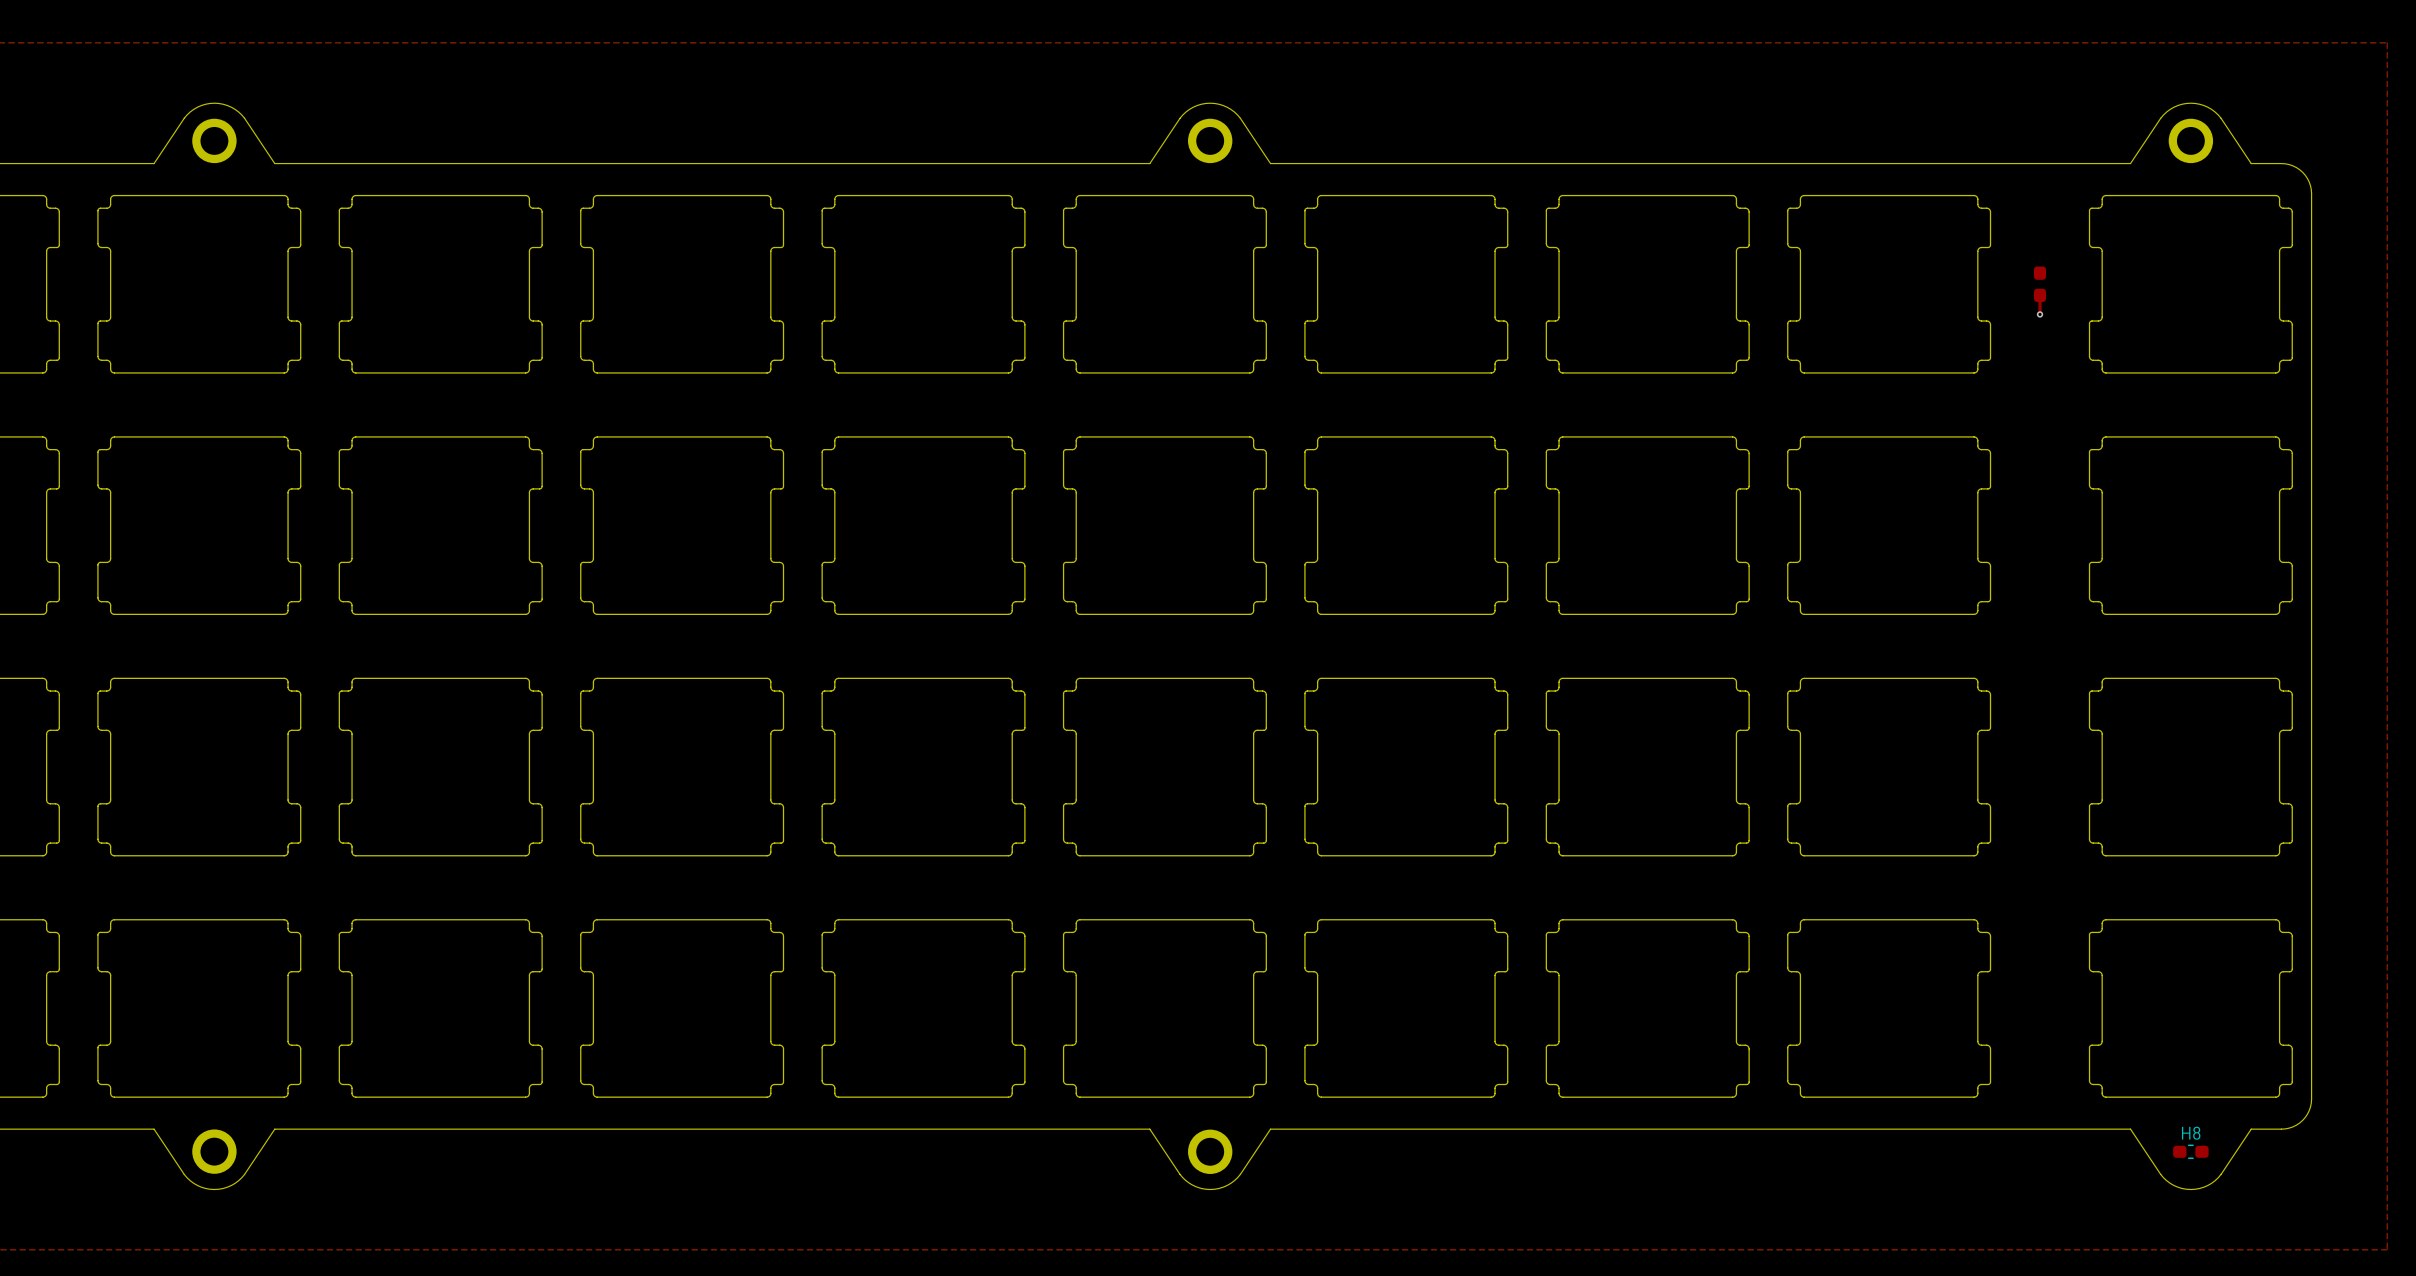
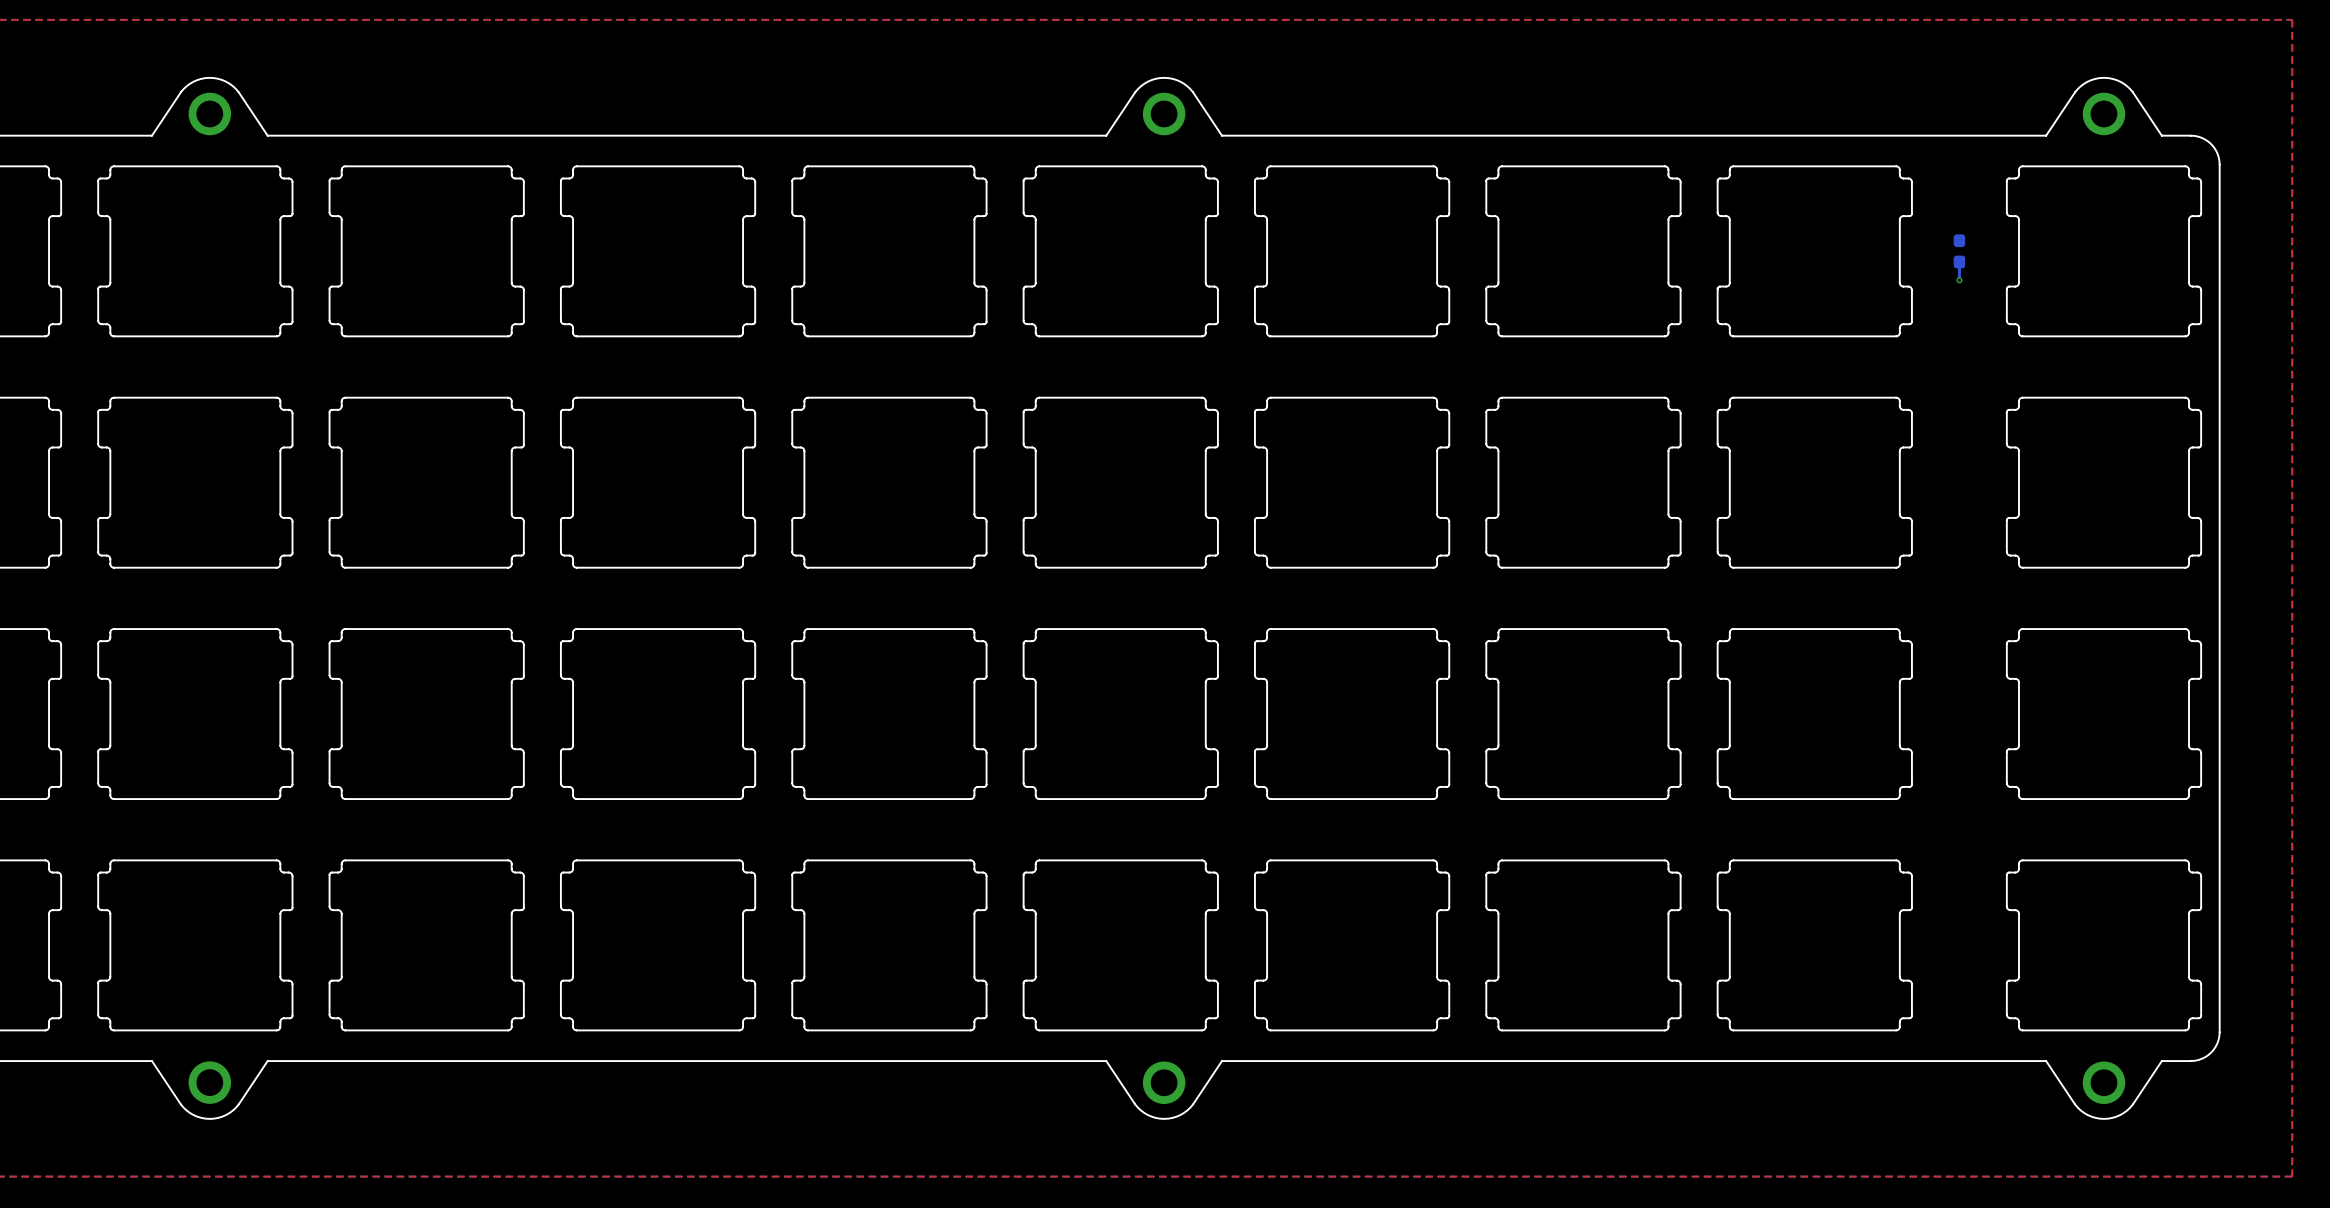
part side: top (2040, 284) -> bottom (1959, 251)
top track: (2040, 295) (2040, 314) -> none
bottom track: none -> (1959, 261) (1959, 280)
H8: (2190, 1151) -> none
part: none -> (2103, 1082)

